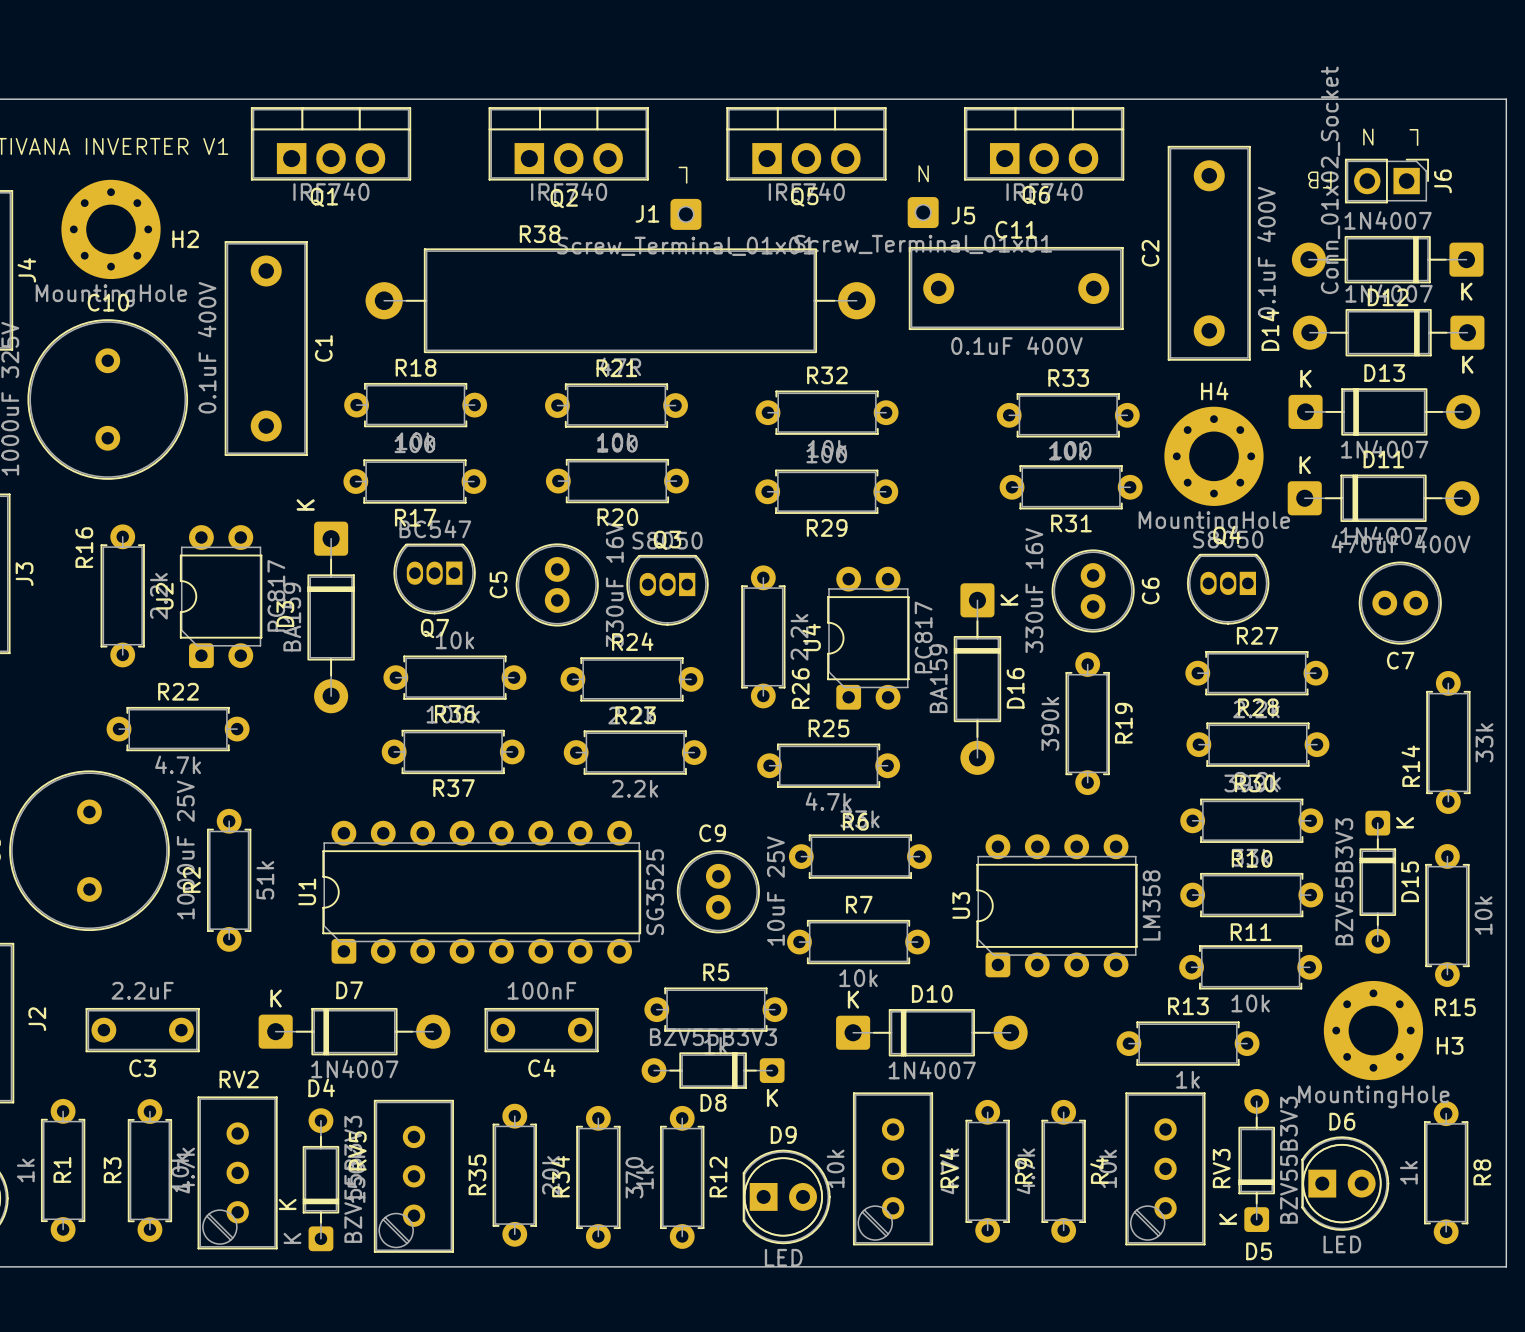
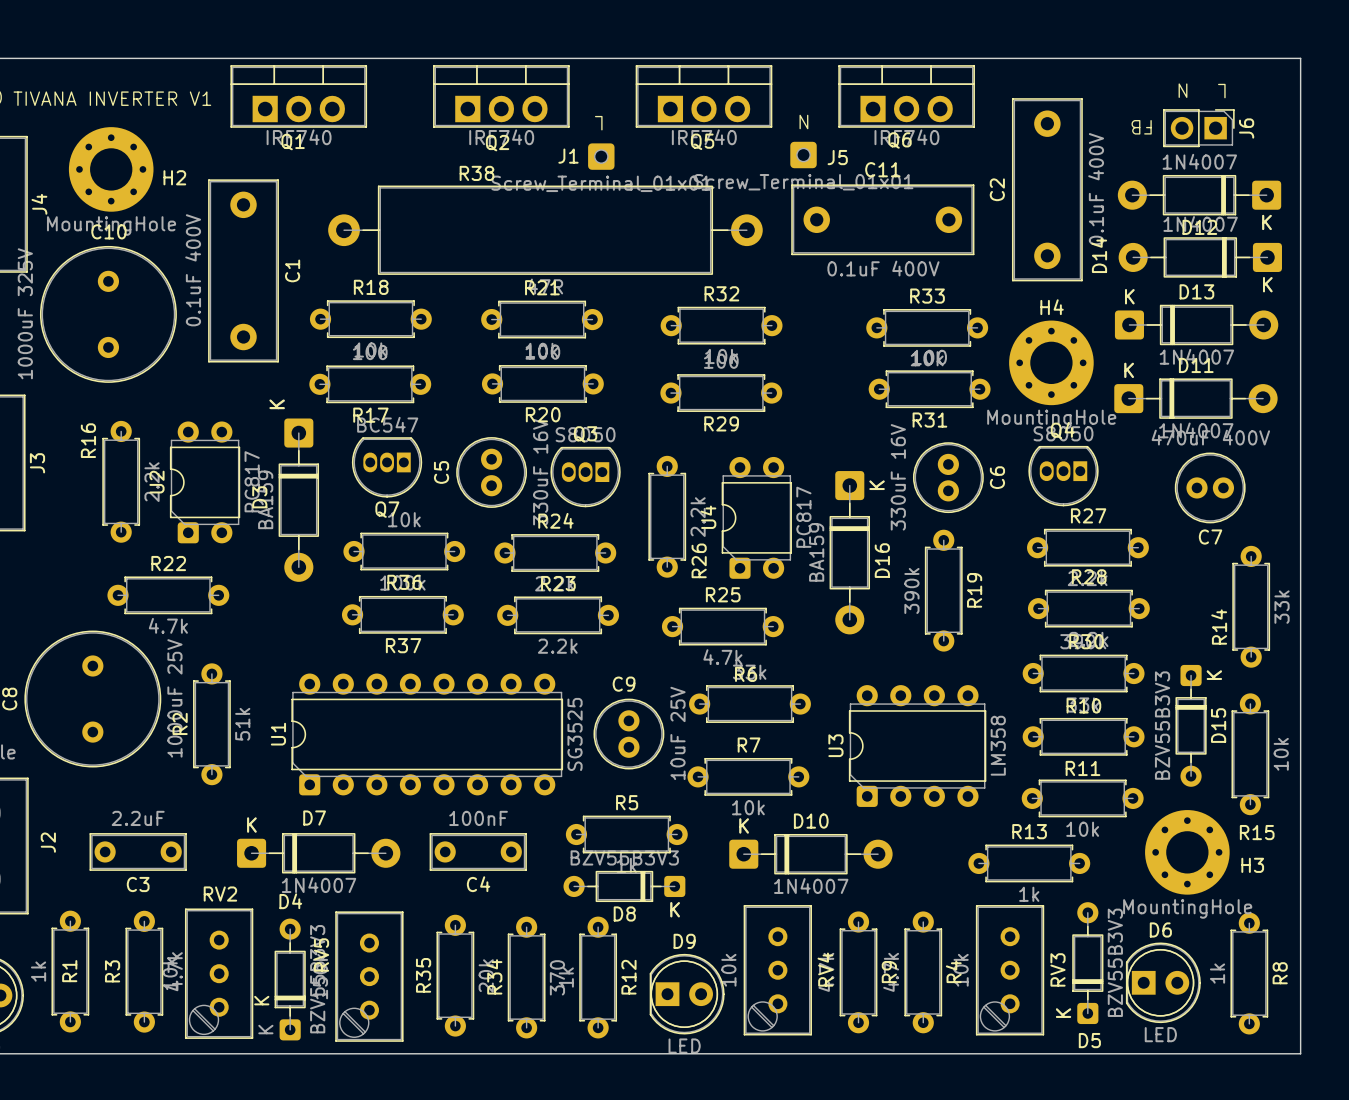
J6 value: Conn_01x02_Socket (1330, 180) -> none

